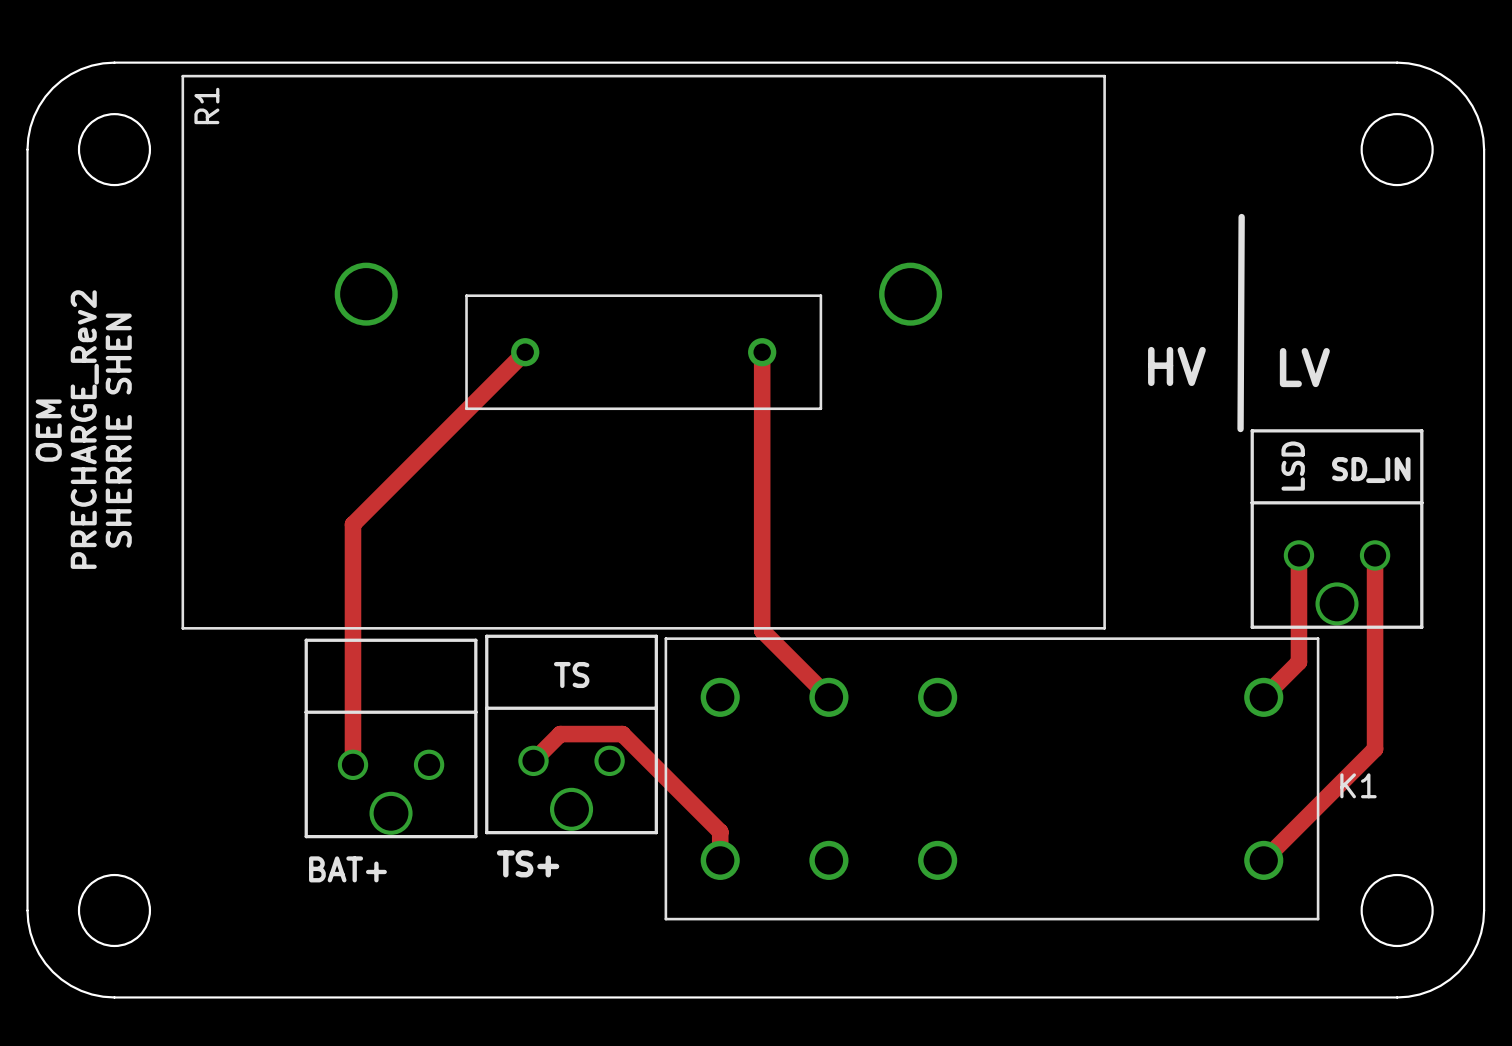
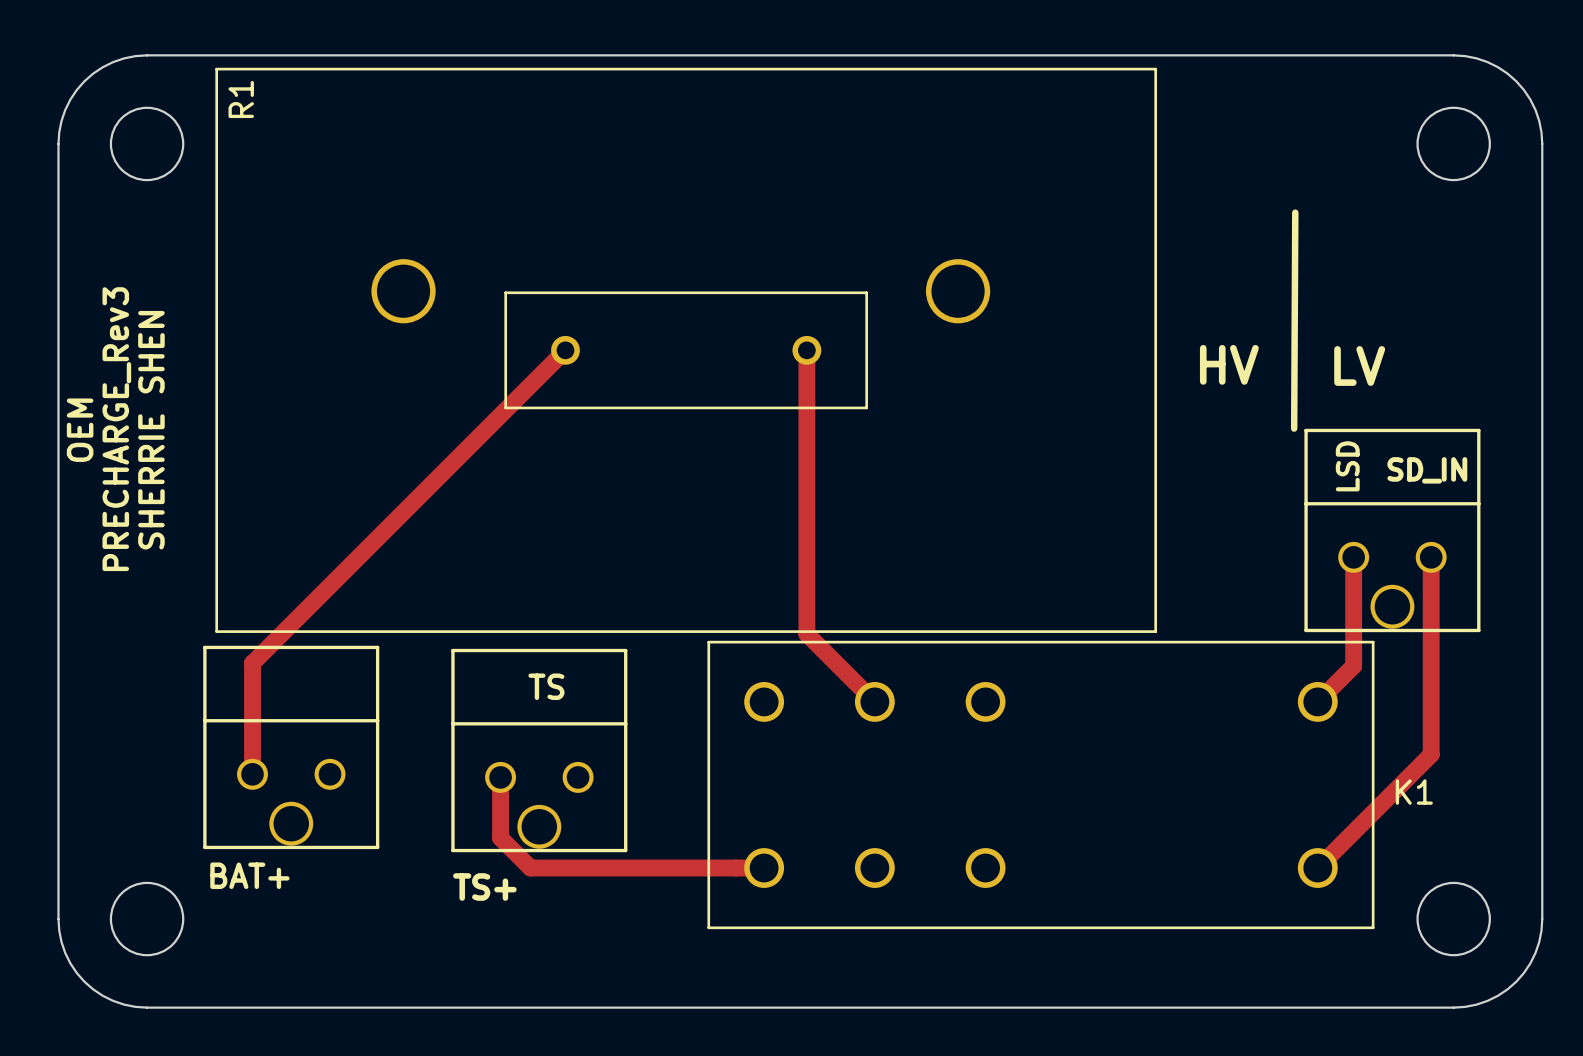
text: PRECHARGE_Rev2 (84, 429) -> PRECHARGE_Rev3 (116, 429)
track: (352, 524) (352, 764) -> (390, 525) (252, 663) (252, 774)
text position: TS (571, 675) -> TS (546, 686)
part: (571, 734) -> none
part: (391, 738) -> none
part: none -> (291, 747)
part: none -> (539, 750)
track: (533, 760) (560, 734) (622, 734) (720, 831) (720, 860) -> (500, 777) (500, 837) (530, 868) (764, 868)
text position: TS+ (528, 863) -> TS+ (484, 887)
text position: BAT+ (347, 869) -> BAT+ (249, 875)

